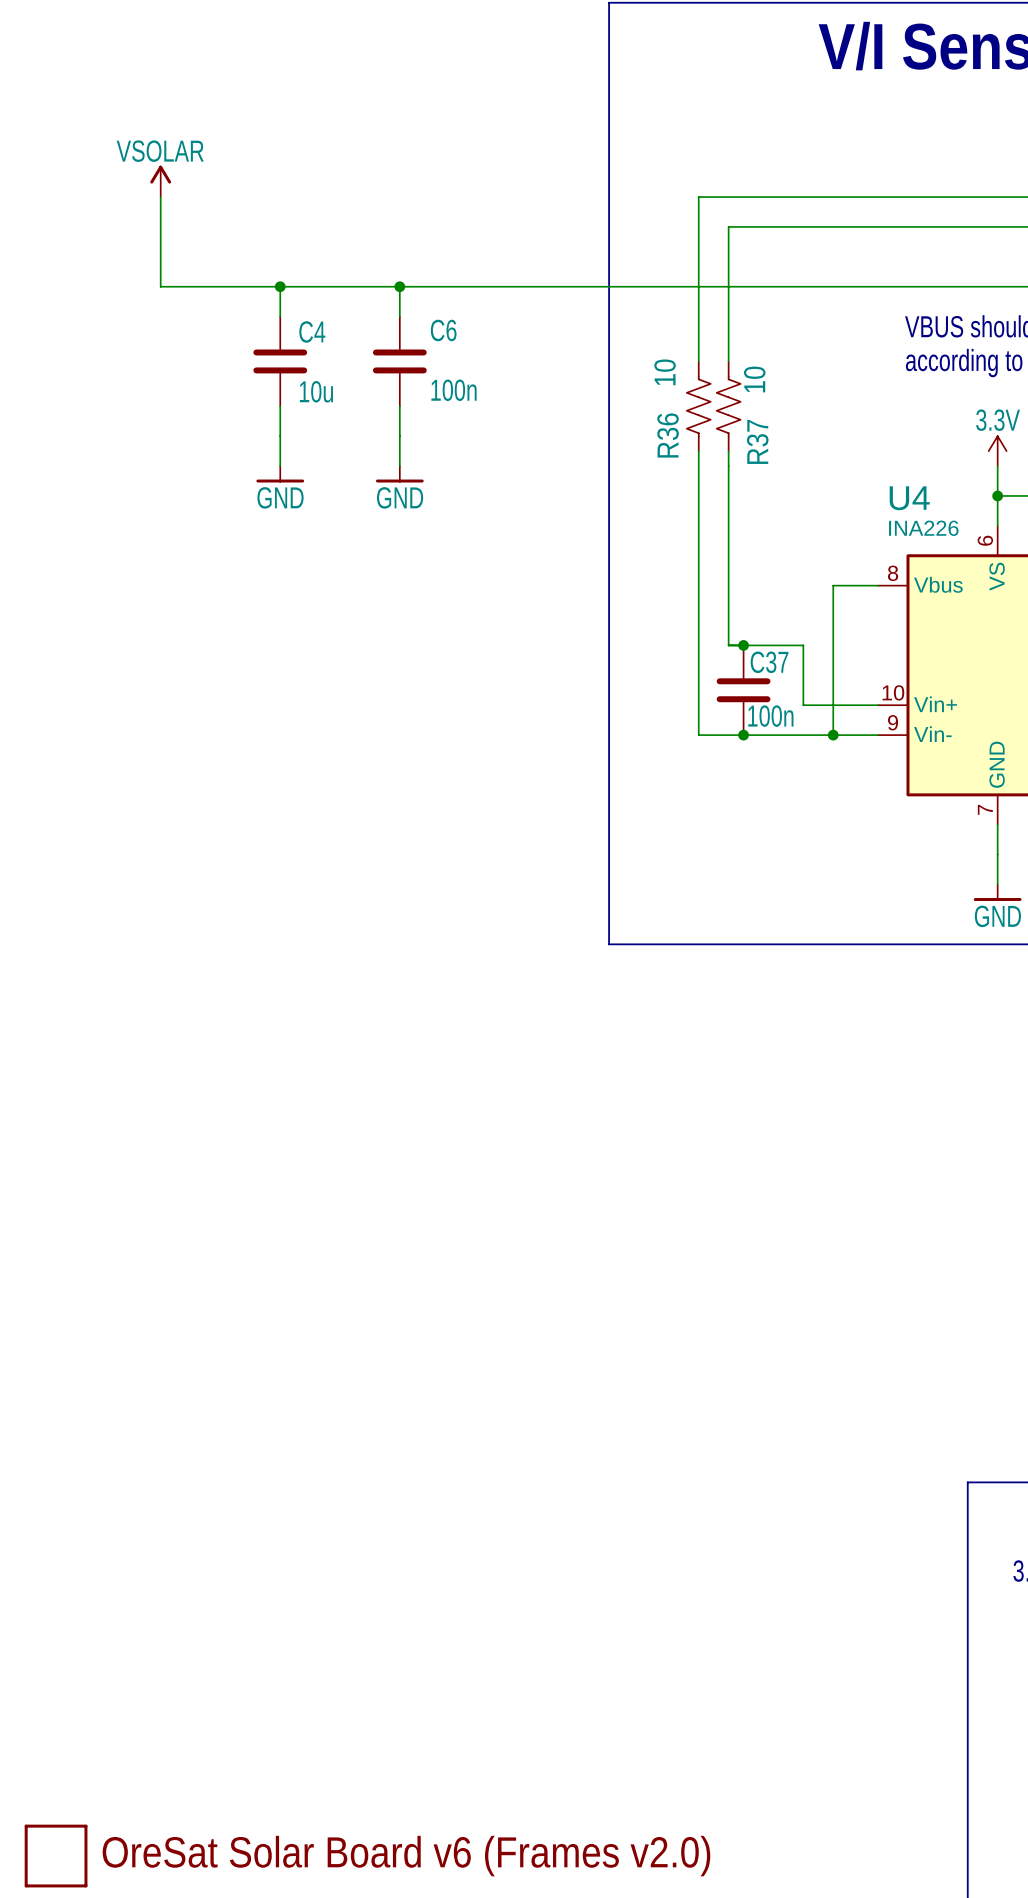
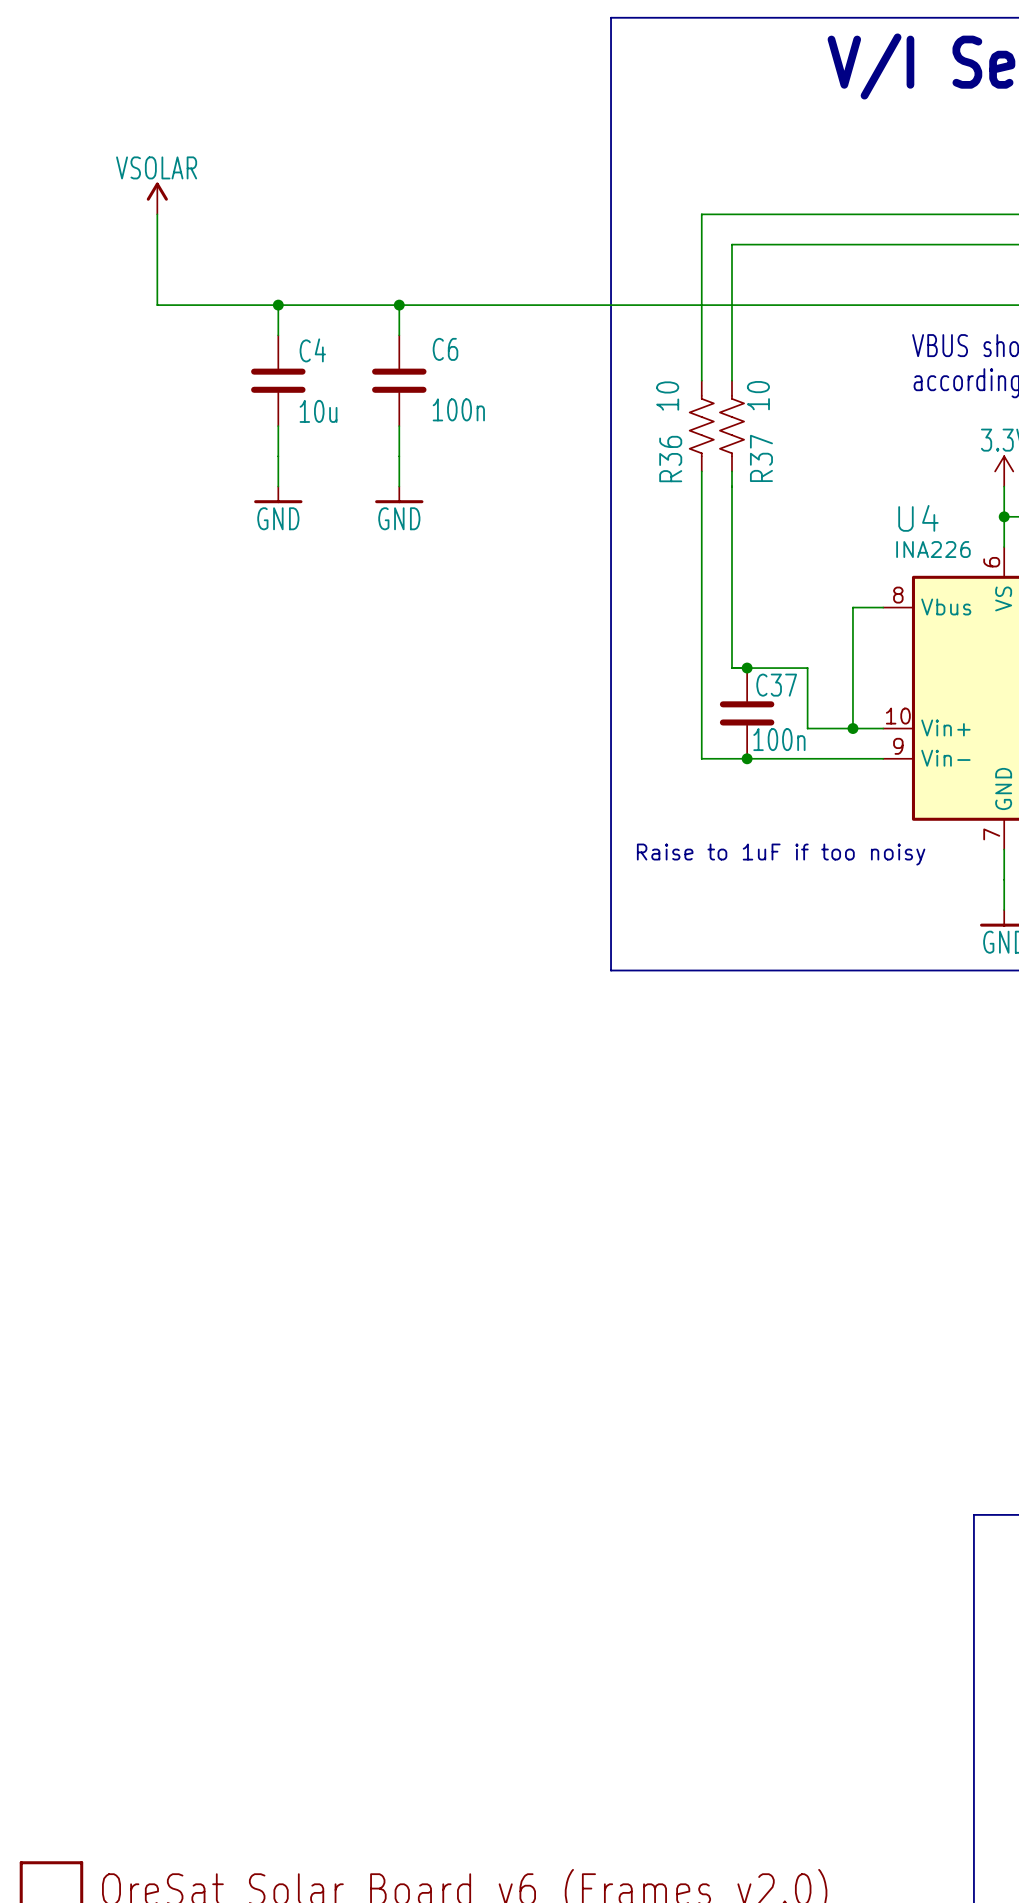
wire: (848, 585) (833, 585) (833, 735) -> (852, 607) (852, 728)
junction position: (833, 735) -> (852, 728)
text: none -> Raise to 1uF if too noisy (781, 854)

